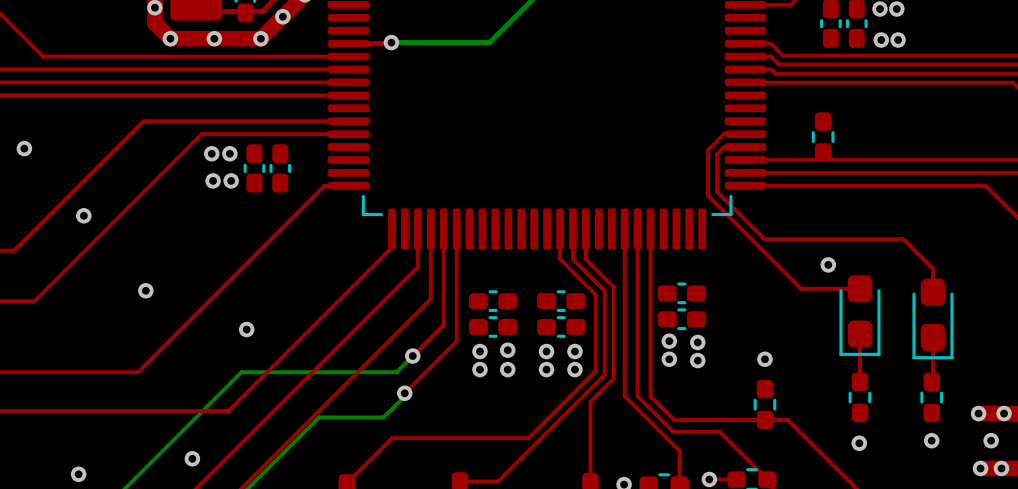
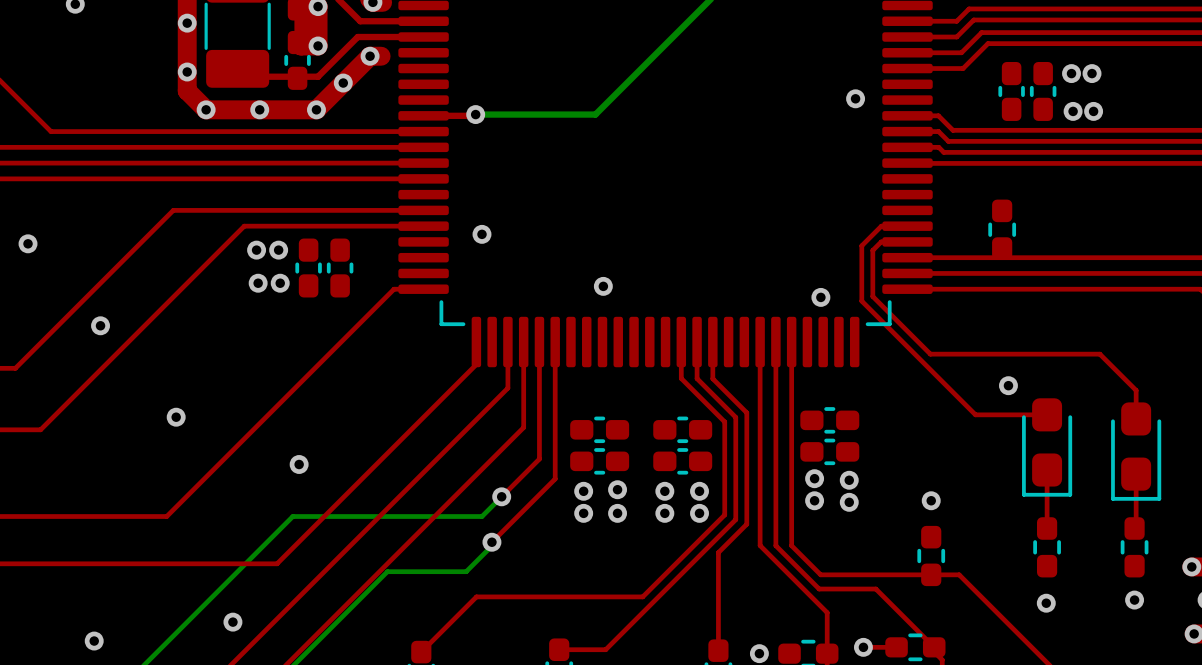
via: none -> (855, 98)
via: none -> (481, 234)
via: none -> (603, 286)
via: none -> (820, 297)

